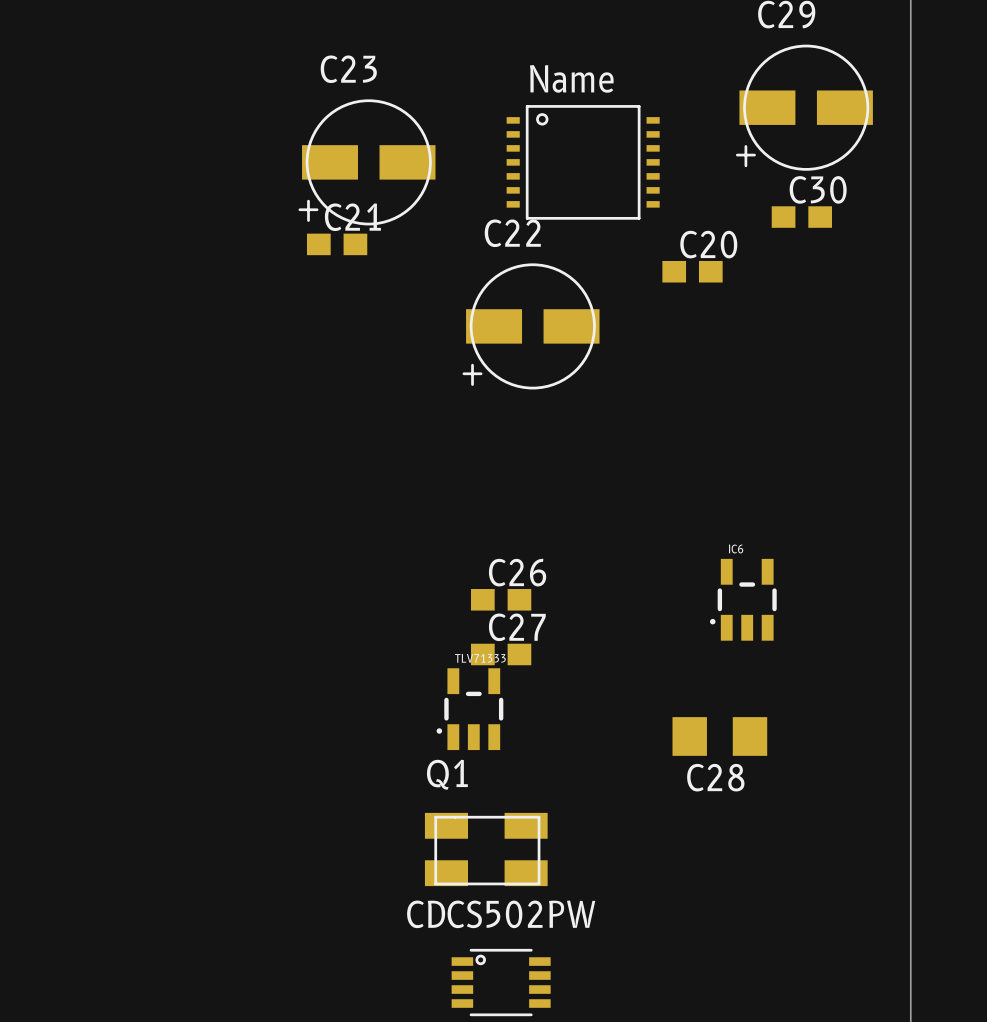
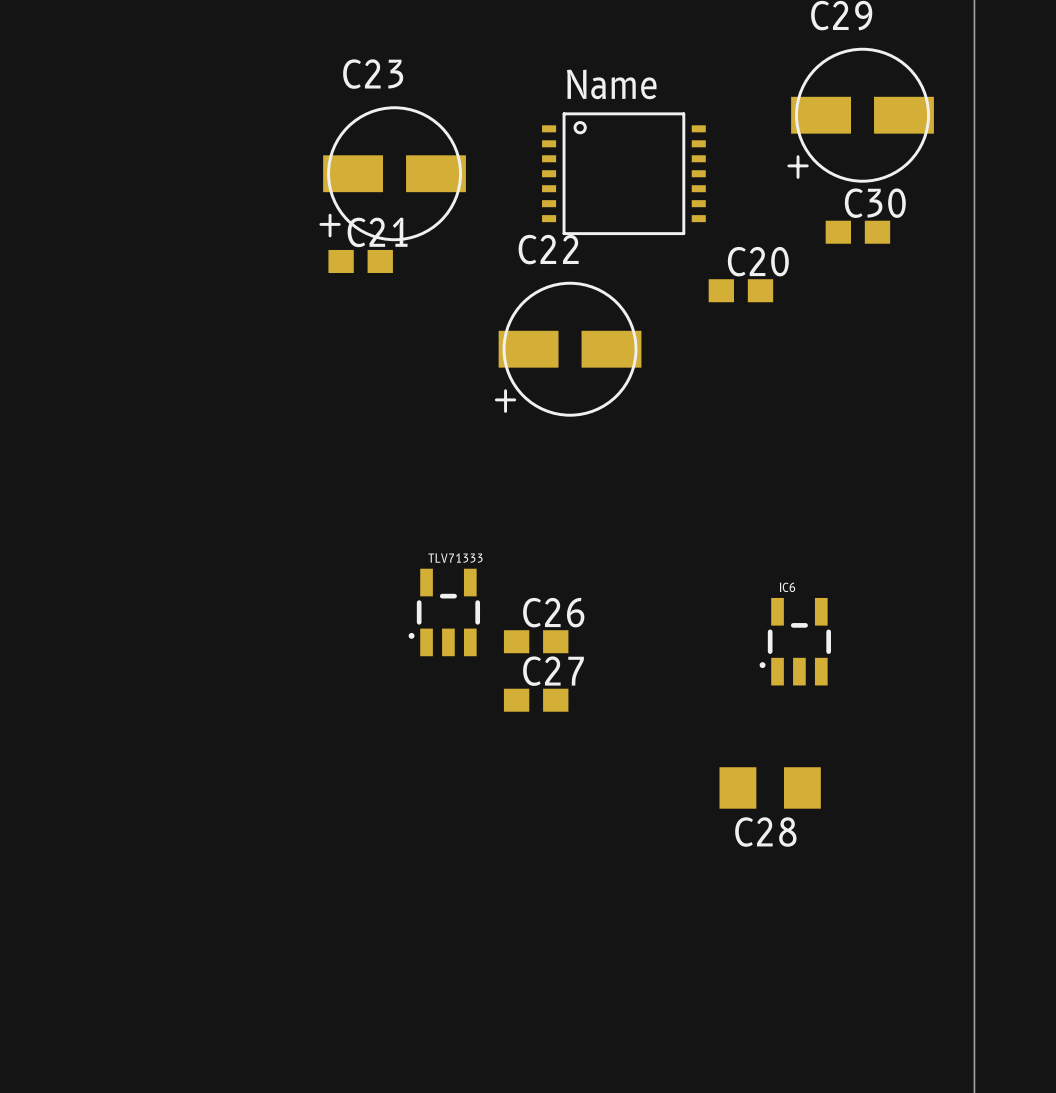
TLV71333 position: (469, 709) -> (444, 612)
Q1: (486, 849) -> none
CDCS502PW: (501, 982) -> none

